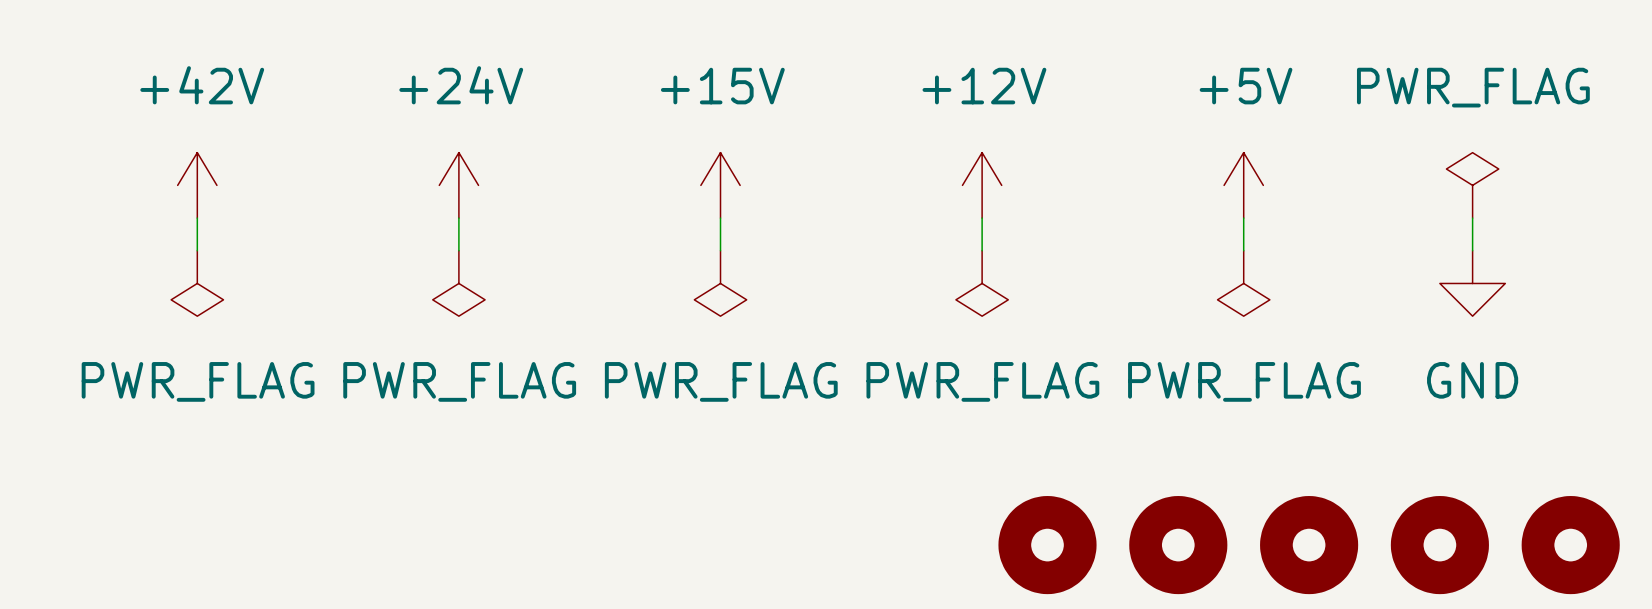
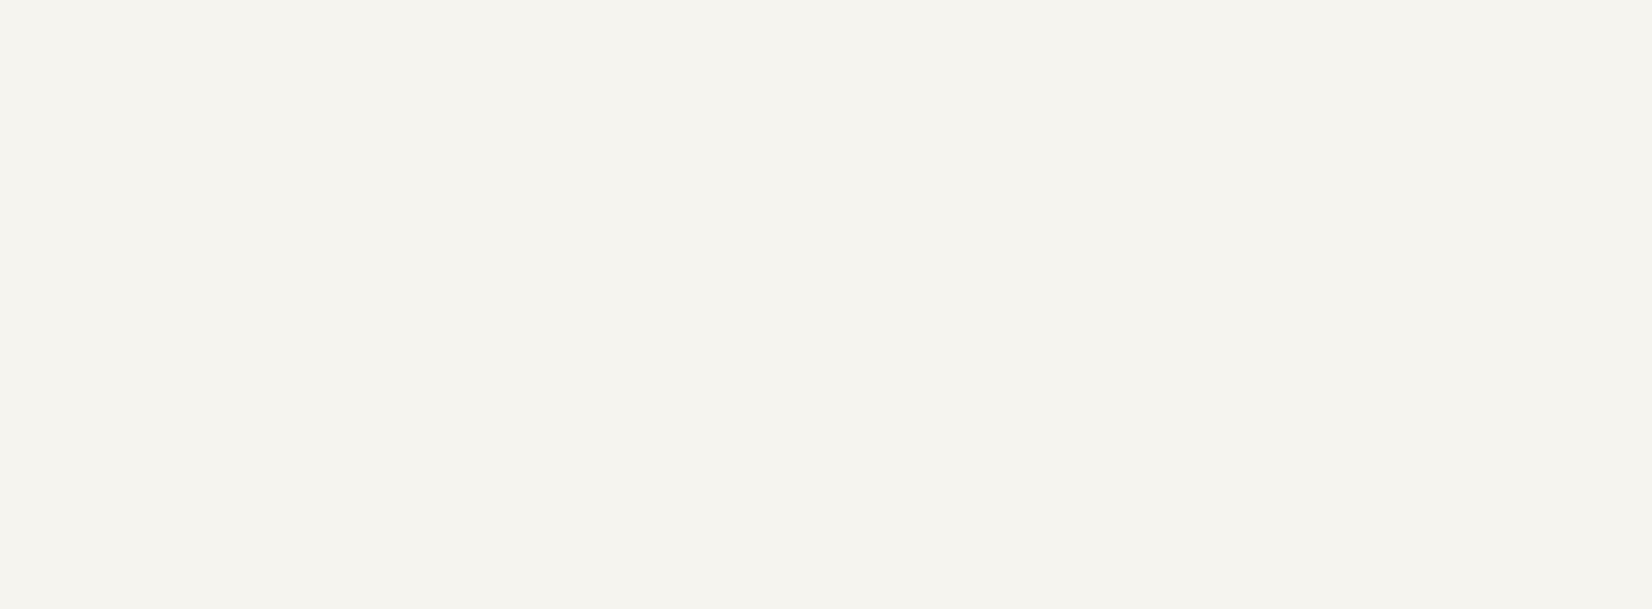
power symbol: +42V (197, 185) -> none
power symbol: +24V (458, 185) -> none
power symbol: +15V (720, 185) -> none
power symbol: +12V (982, 185) -> none
power symbol: +5V (1243, 185) -> none
power symbol: PWR_FLAG (1472, 185) -> none
wire: (197, 218) (197, 250) -> none
wire: (458, 218) (458, 250) -> none
wire: (720, 218) (720, 250) -> none
wire: (982, 218) (982, 250) -> none
wire: (1243, 218) (1243, 250) -> none
wire: (1472, 218) (1472, 250) -> none
power symbol: PWR_FLAG (197, 283) -> none
power symbol: PWR_FLAG (458, 283) -> none
power symbol: PWR_FLAG (720, 283) -> none
power symbol: PWR_FLAG (982, 283) -> none
power symbol: PWR_FLAG (1243, 283) -> none
power symbol: GND (1472, 283) -> none
part: (1047, 545) -> none
part: (1178, 545) -> none
part: (1309, 545) -> none
part: (1439, 545) -> none
part: (1570, 545) -> none

